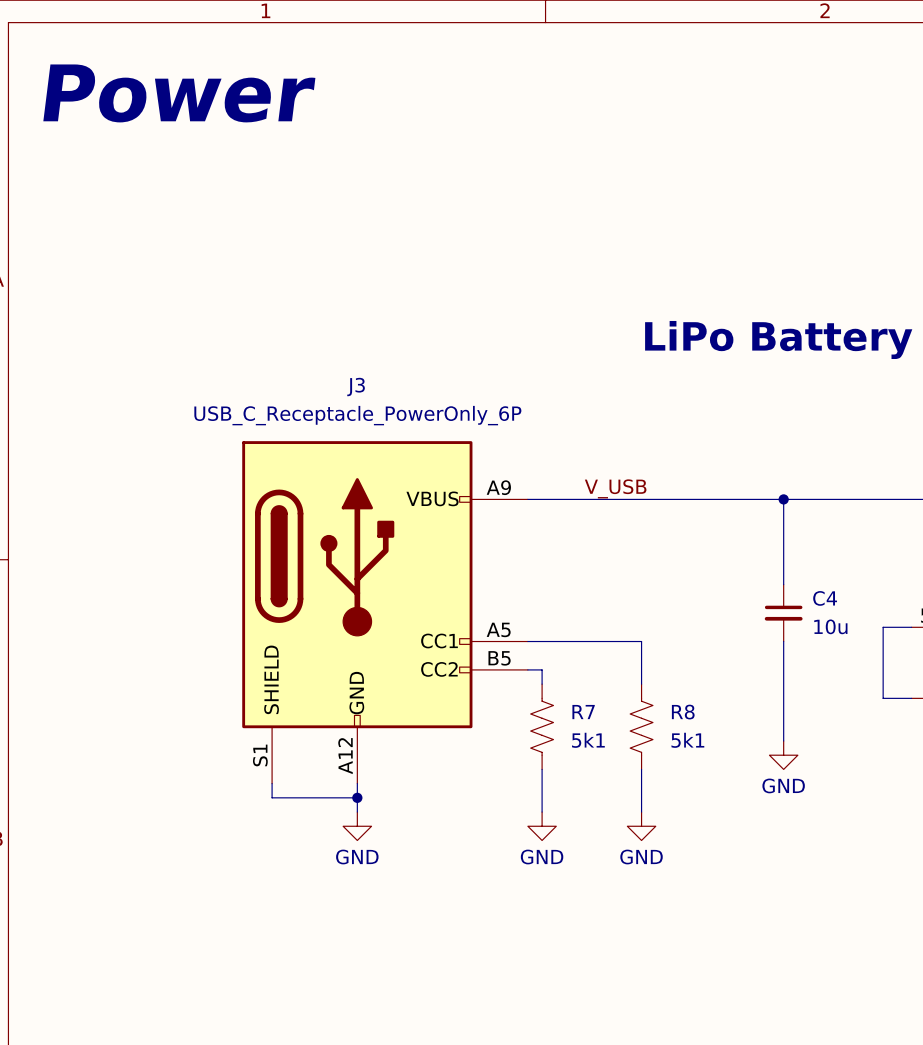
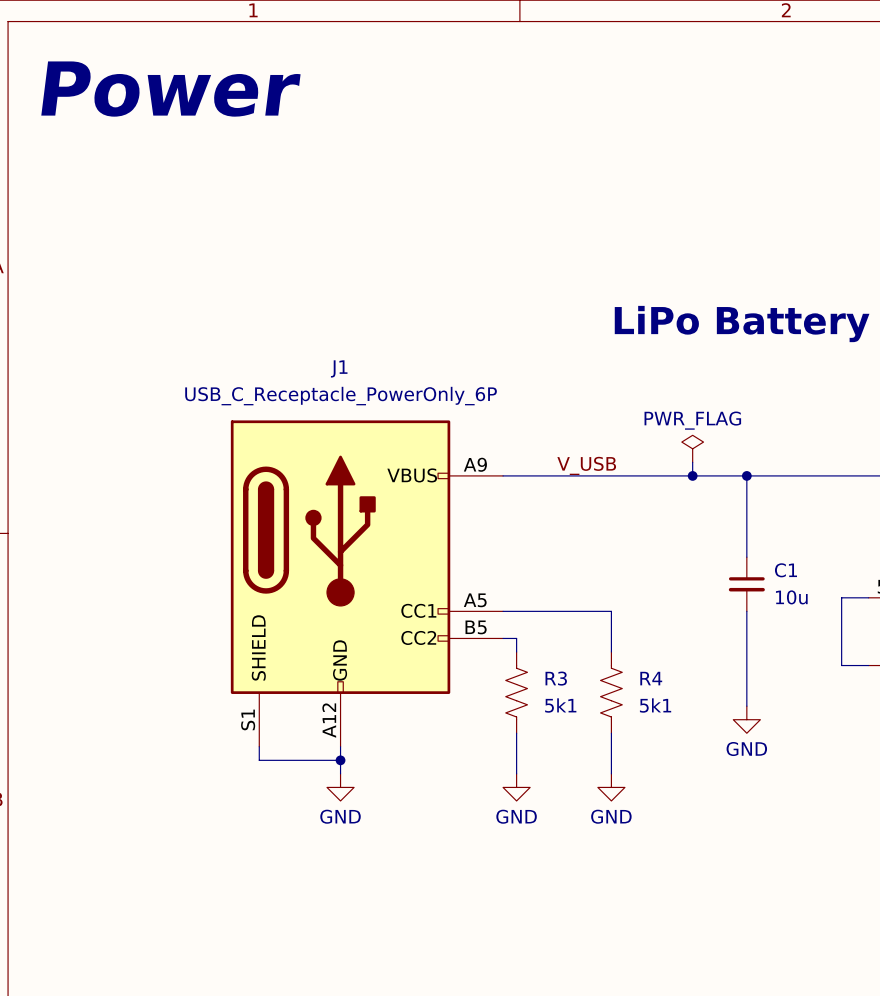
J3 name: J3 (356, 387) -> J1 (339, 368)
power symbol: none -> PWR_FLAG (692, 448)
wire: none -> (692, 462) (692, 475)
junction: none -> (692, 475)
C4 name: C4 (825, 598) -> C1 (785, 570)
R7 name: R7 (583, 712) -> R3 (556, 678)
R8 name: R8 (683, 712) -> R4 (651, 678)

